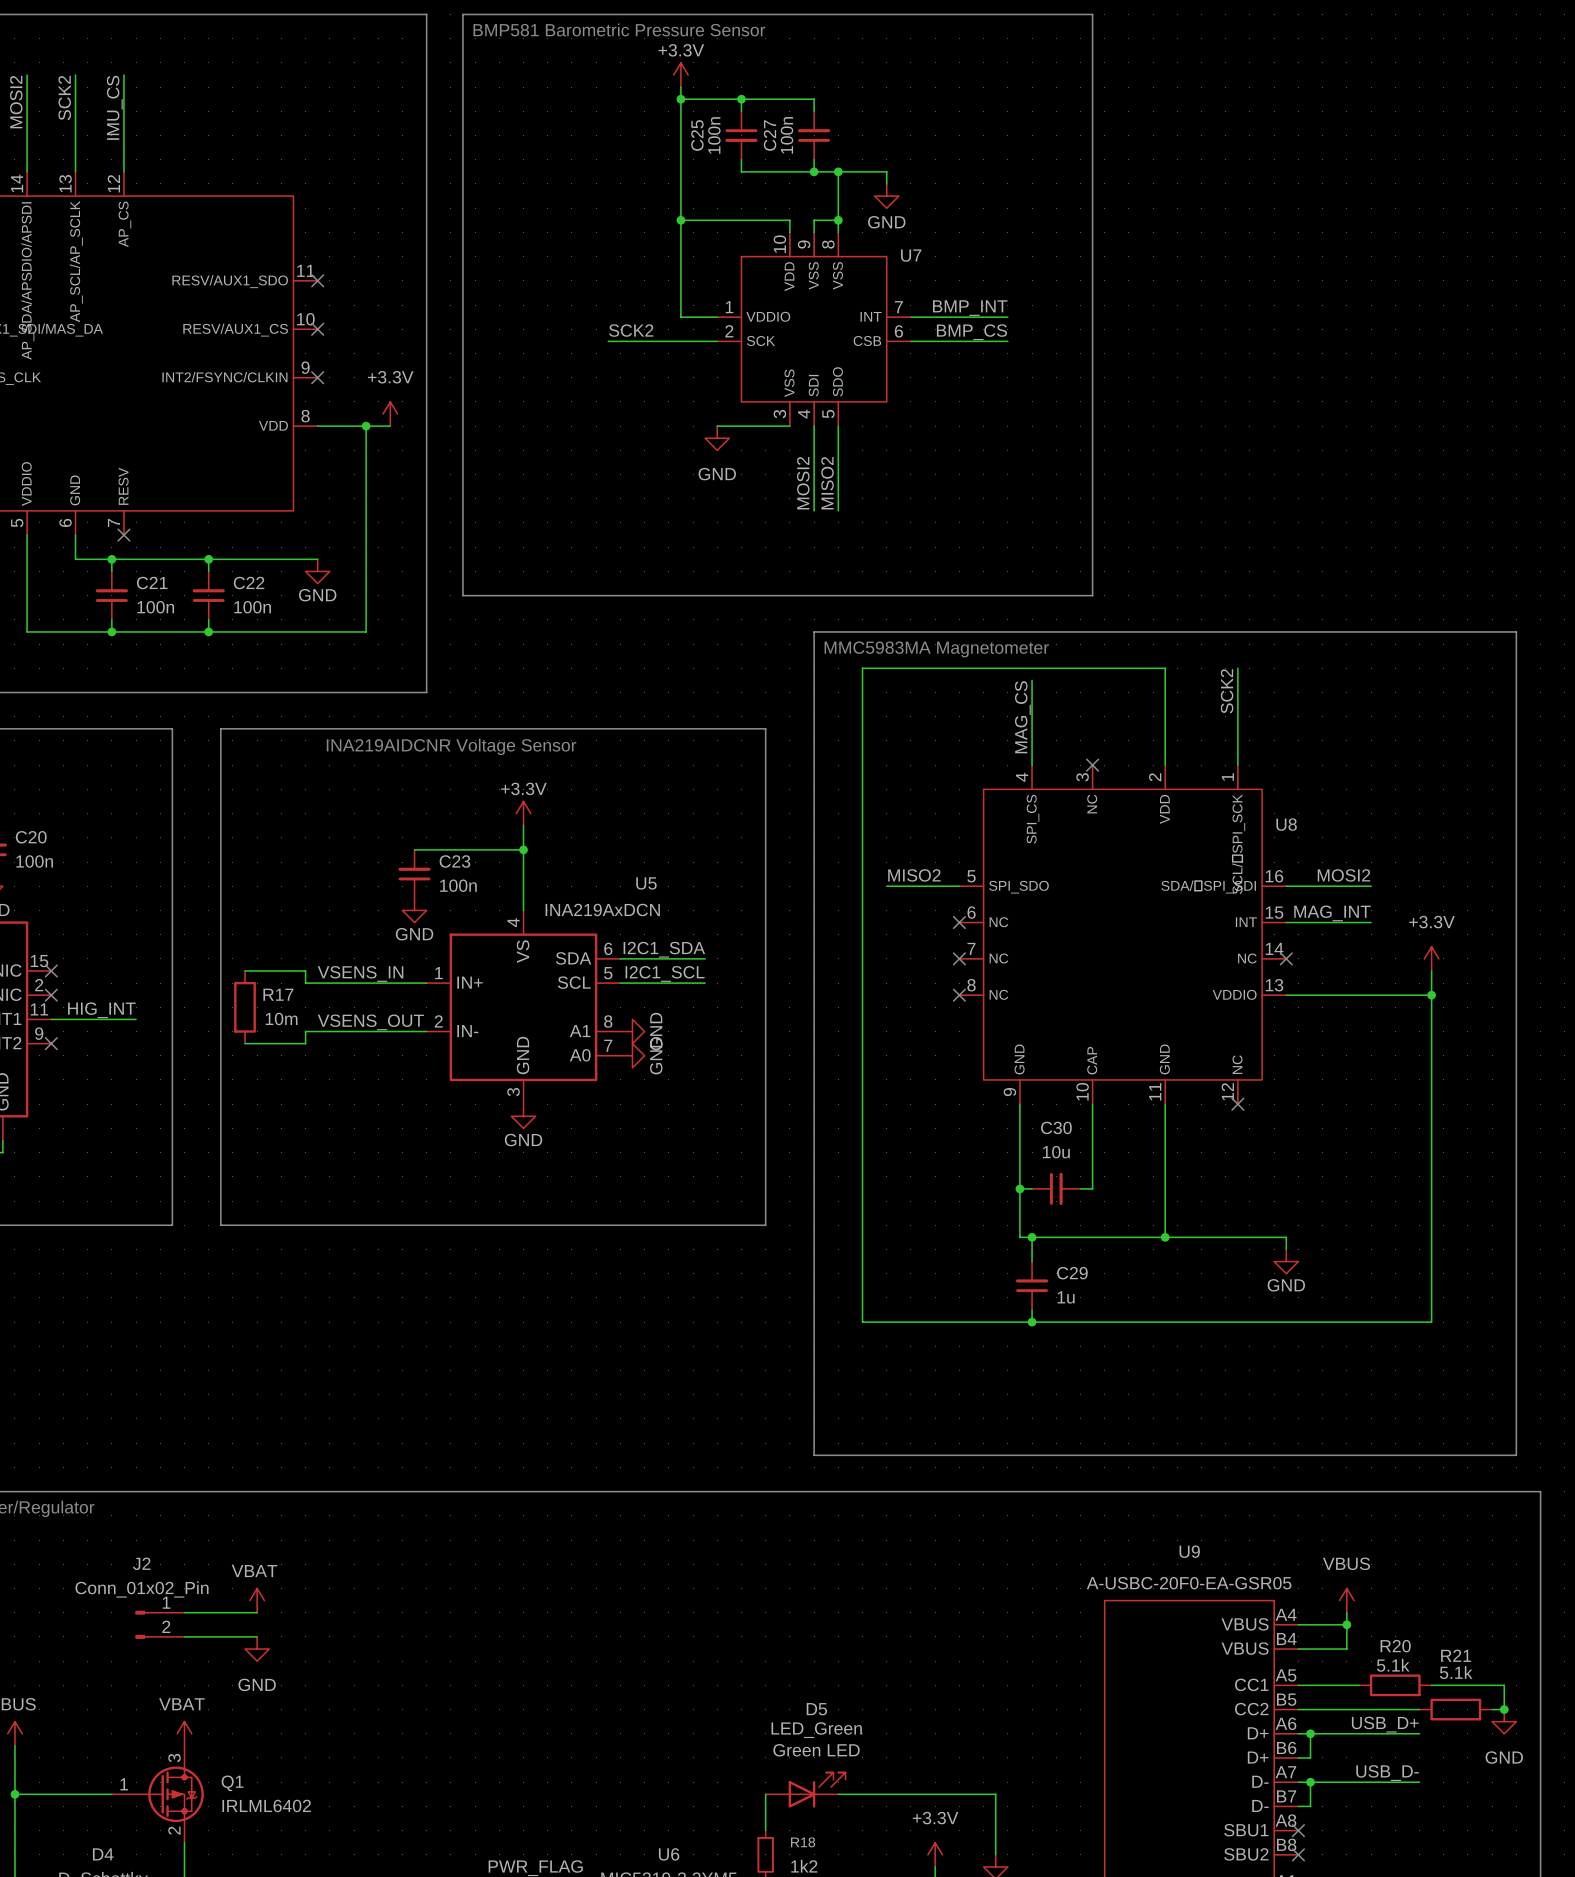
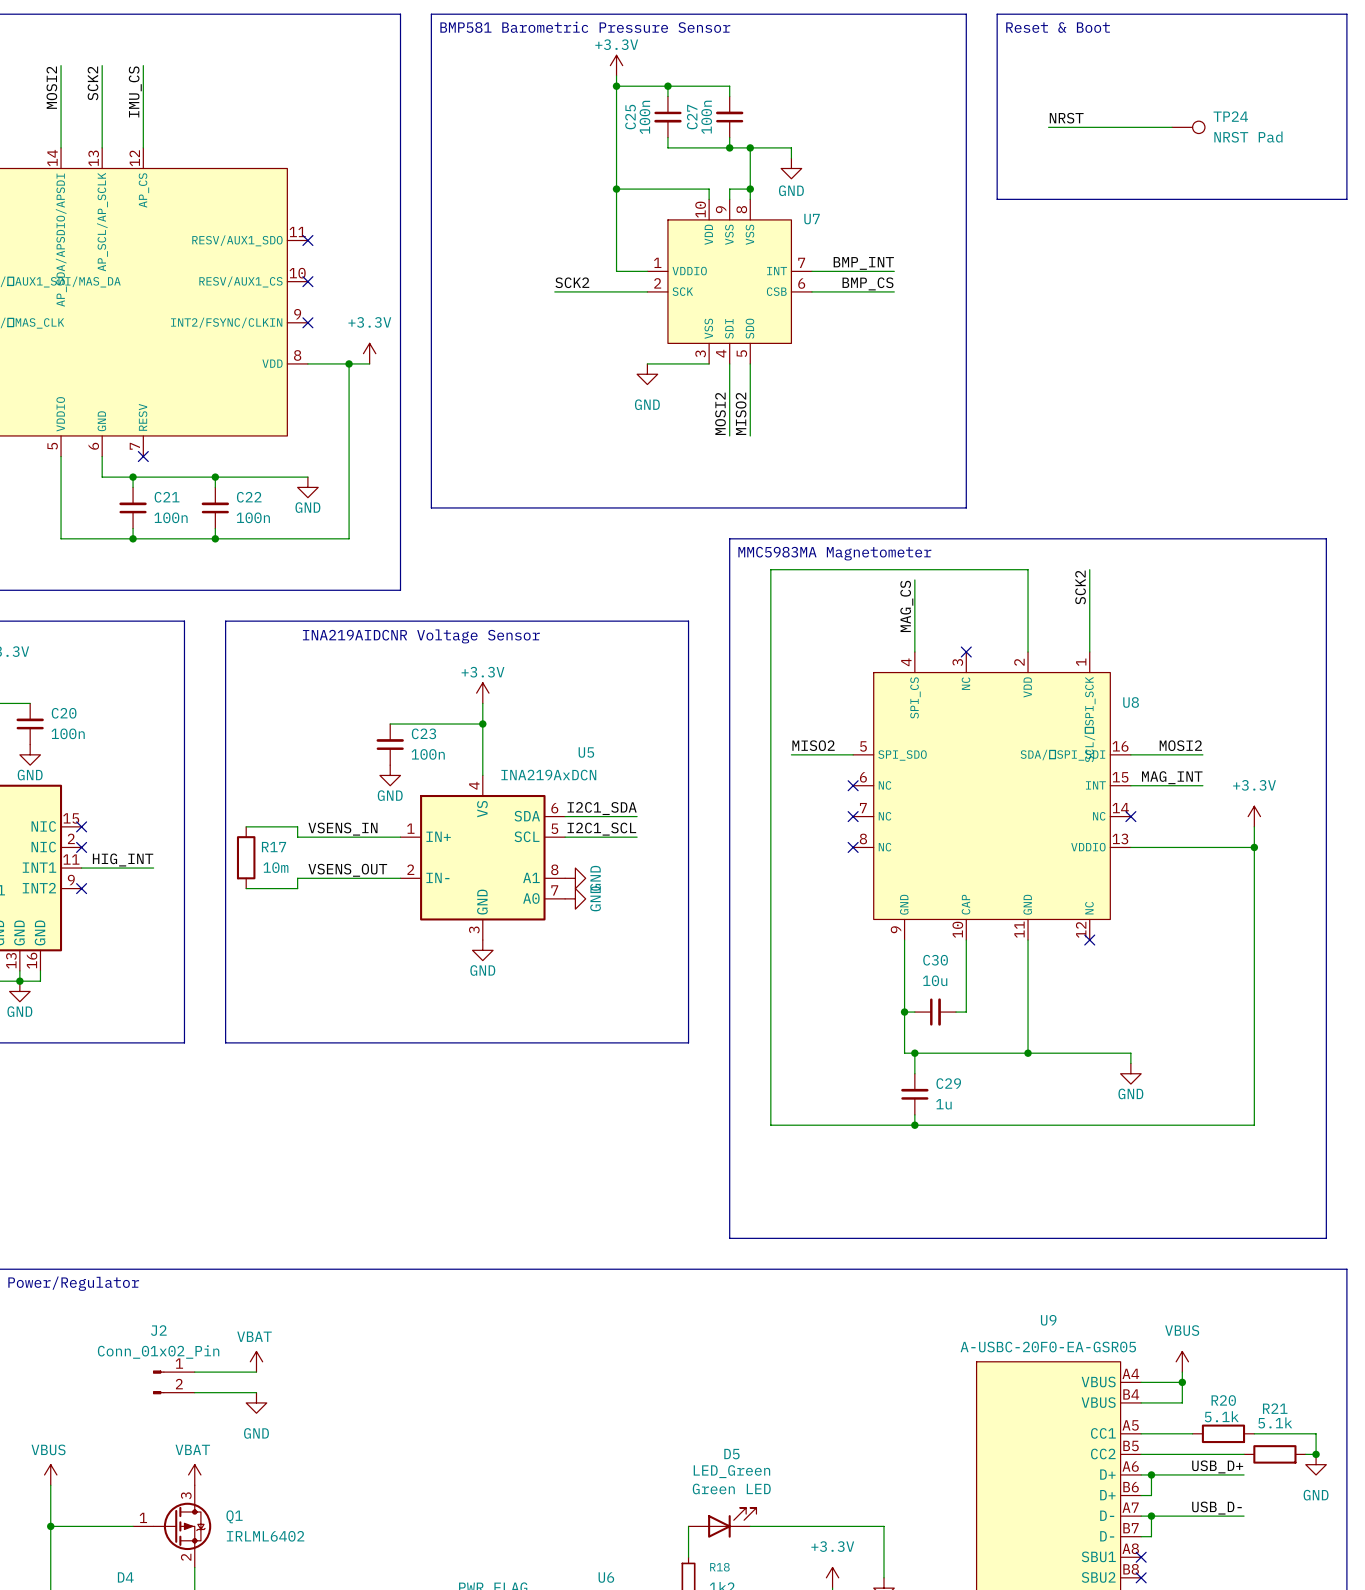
line: none -> (997, 14) (1346, 14) (1346, 199) (997, 199) (997, 14)
text: none -> Reset & Boot (1058, 27)
label: none -> NRST (1066, 118)
wire: none -> (1048, 127) (1172, 127)
TP24: none -> NRST Pad (1188, 127)

